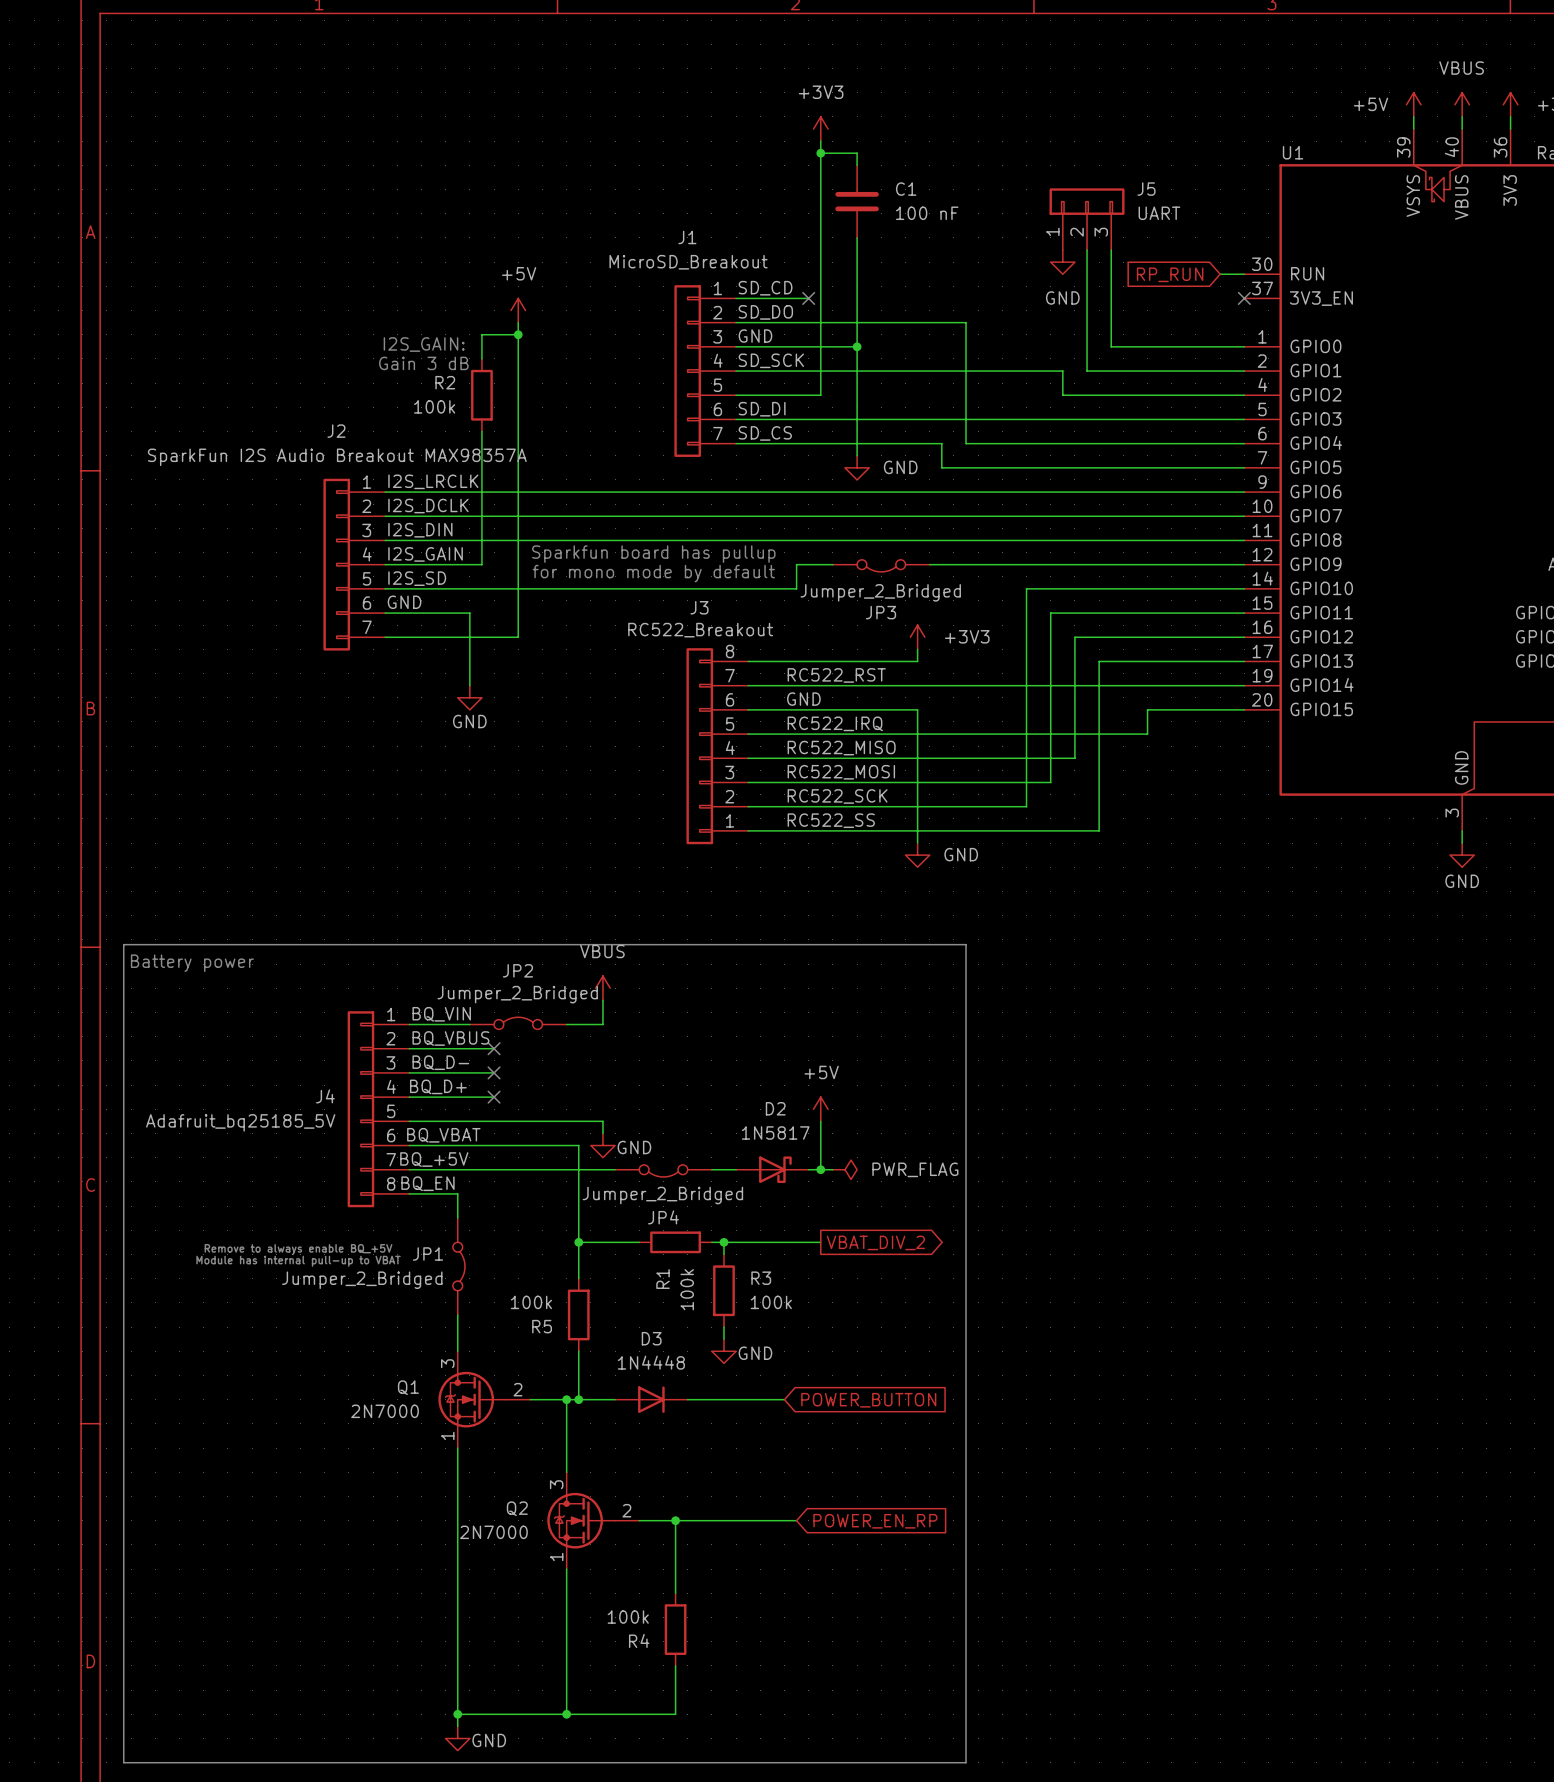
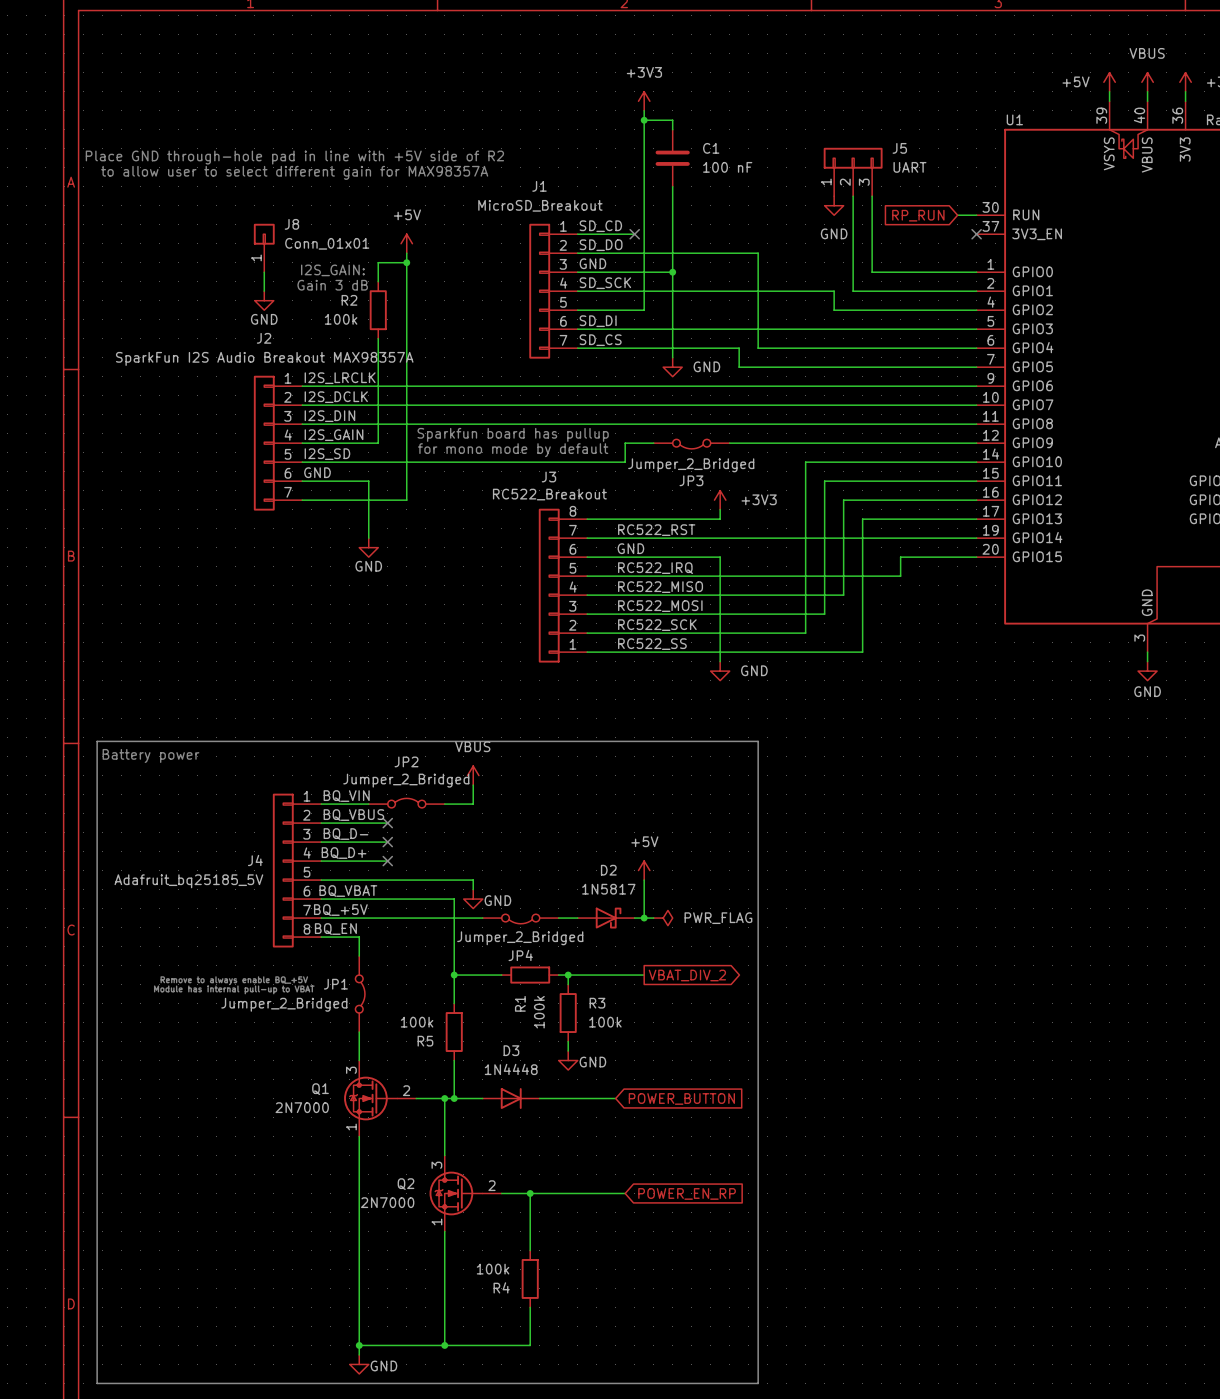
text: none -> Place GND through-hole pad in line with +5V side of R2 (294, 157)
text: none -> to allow user to select different gain for MAX98357A (294, 172)
J8: none -> Conn_01x01 (264, 247)
wire: none -> (264, 272) (264, 291)
power symbol: none -> GND (264, 300)

